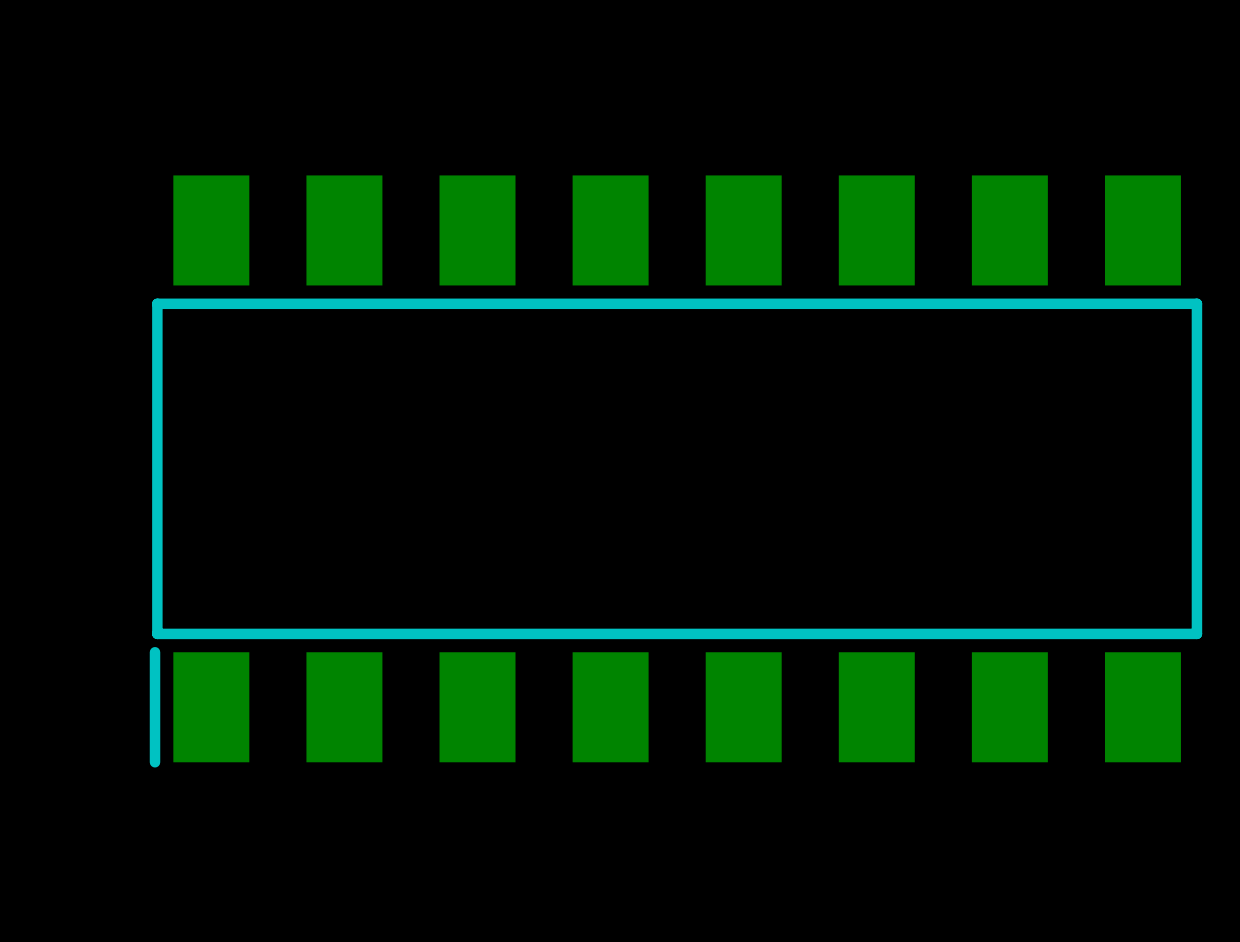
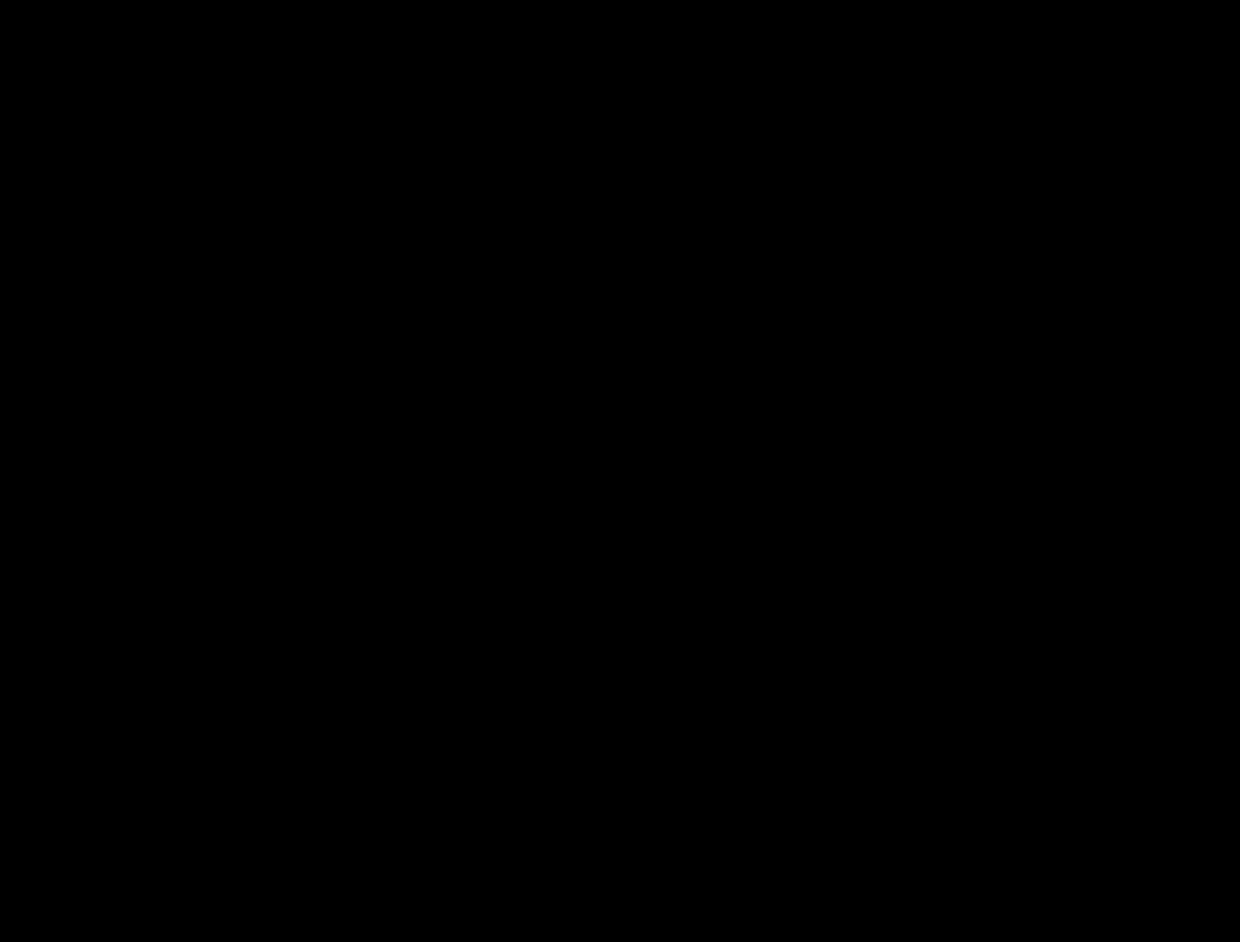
part: (675, 471) -> none

